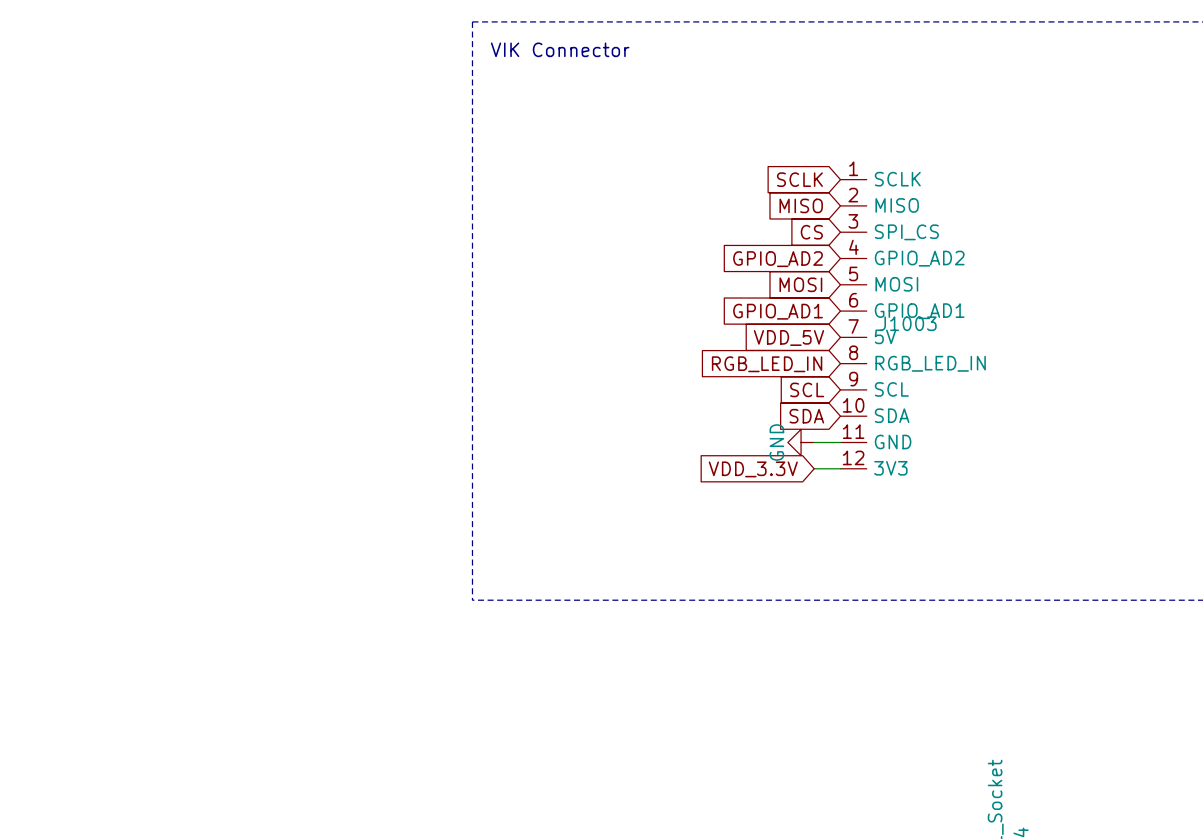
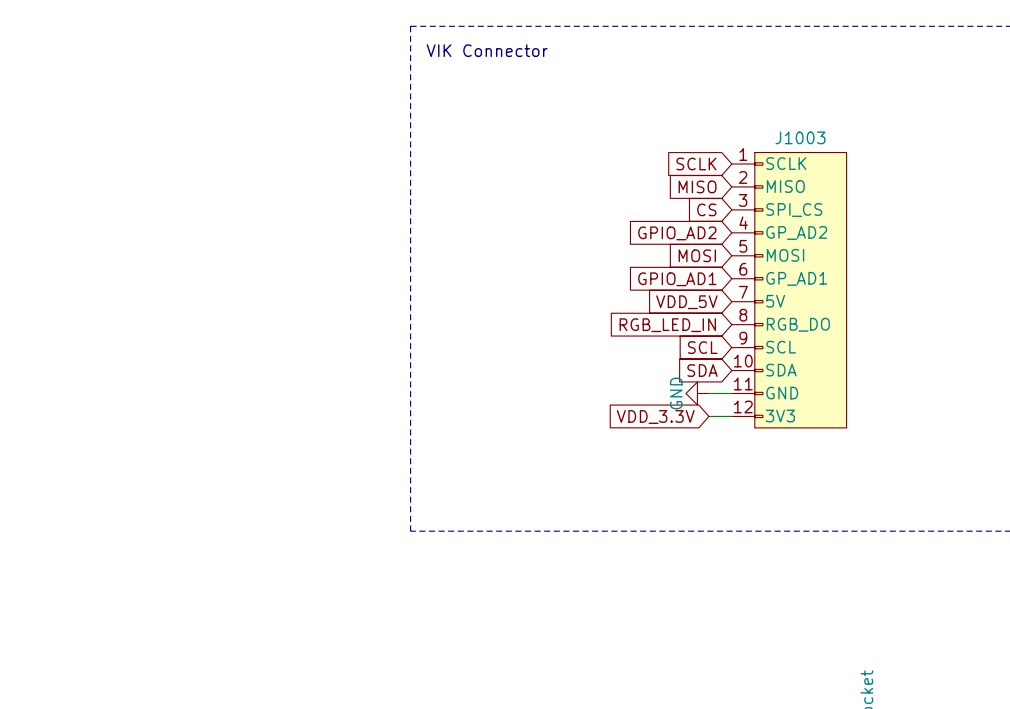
J1003 symbol: [840, 179, 867, 469] -> [731, 152, 847, 428]
J1003 name position: J1003 (908, 323) -> J1003 (800, 137)

